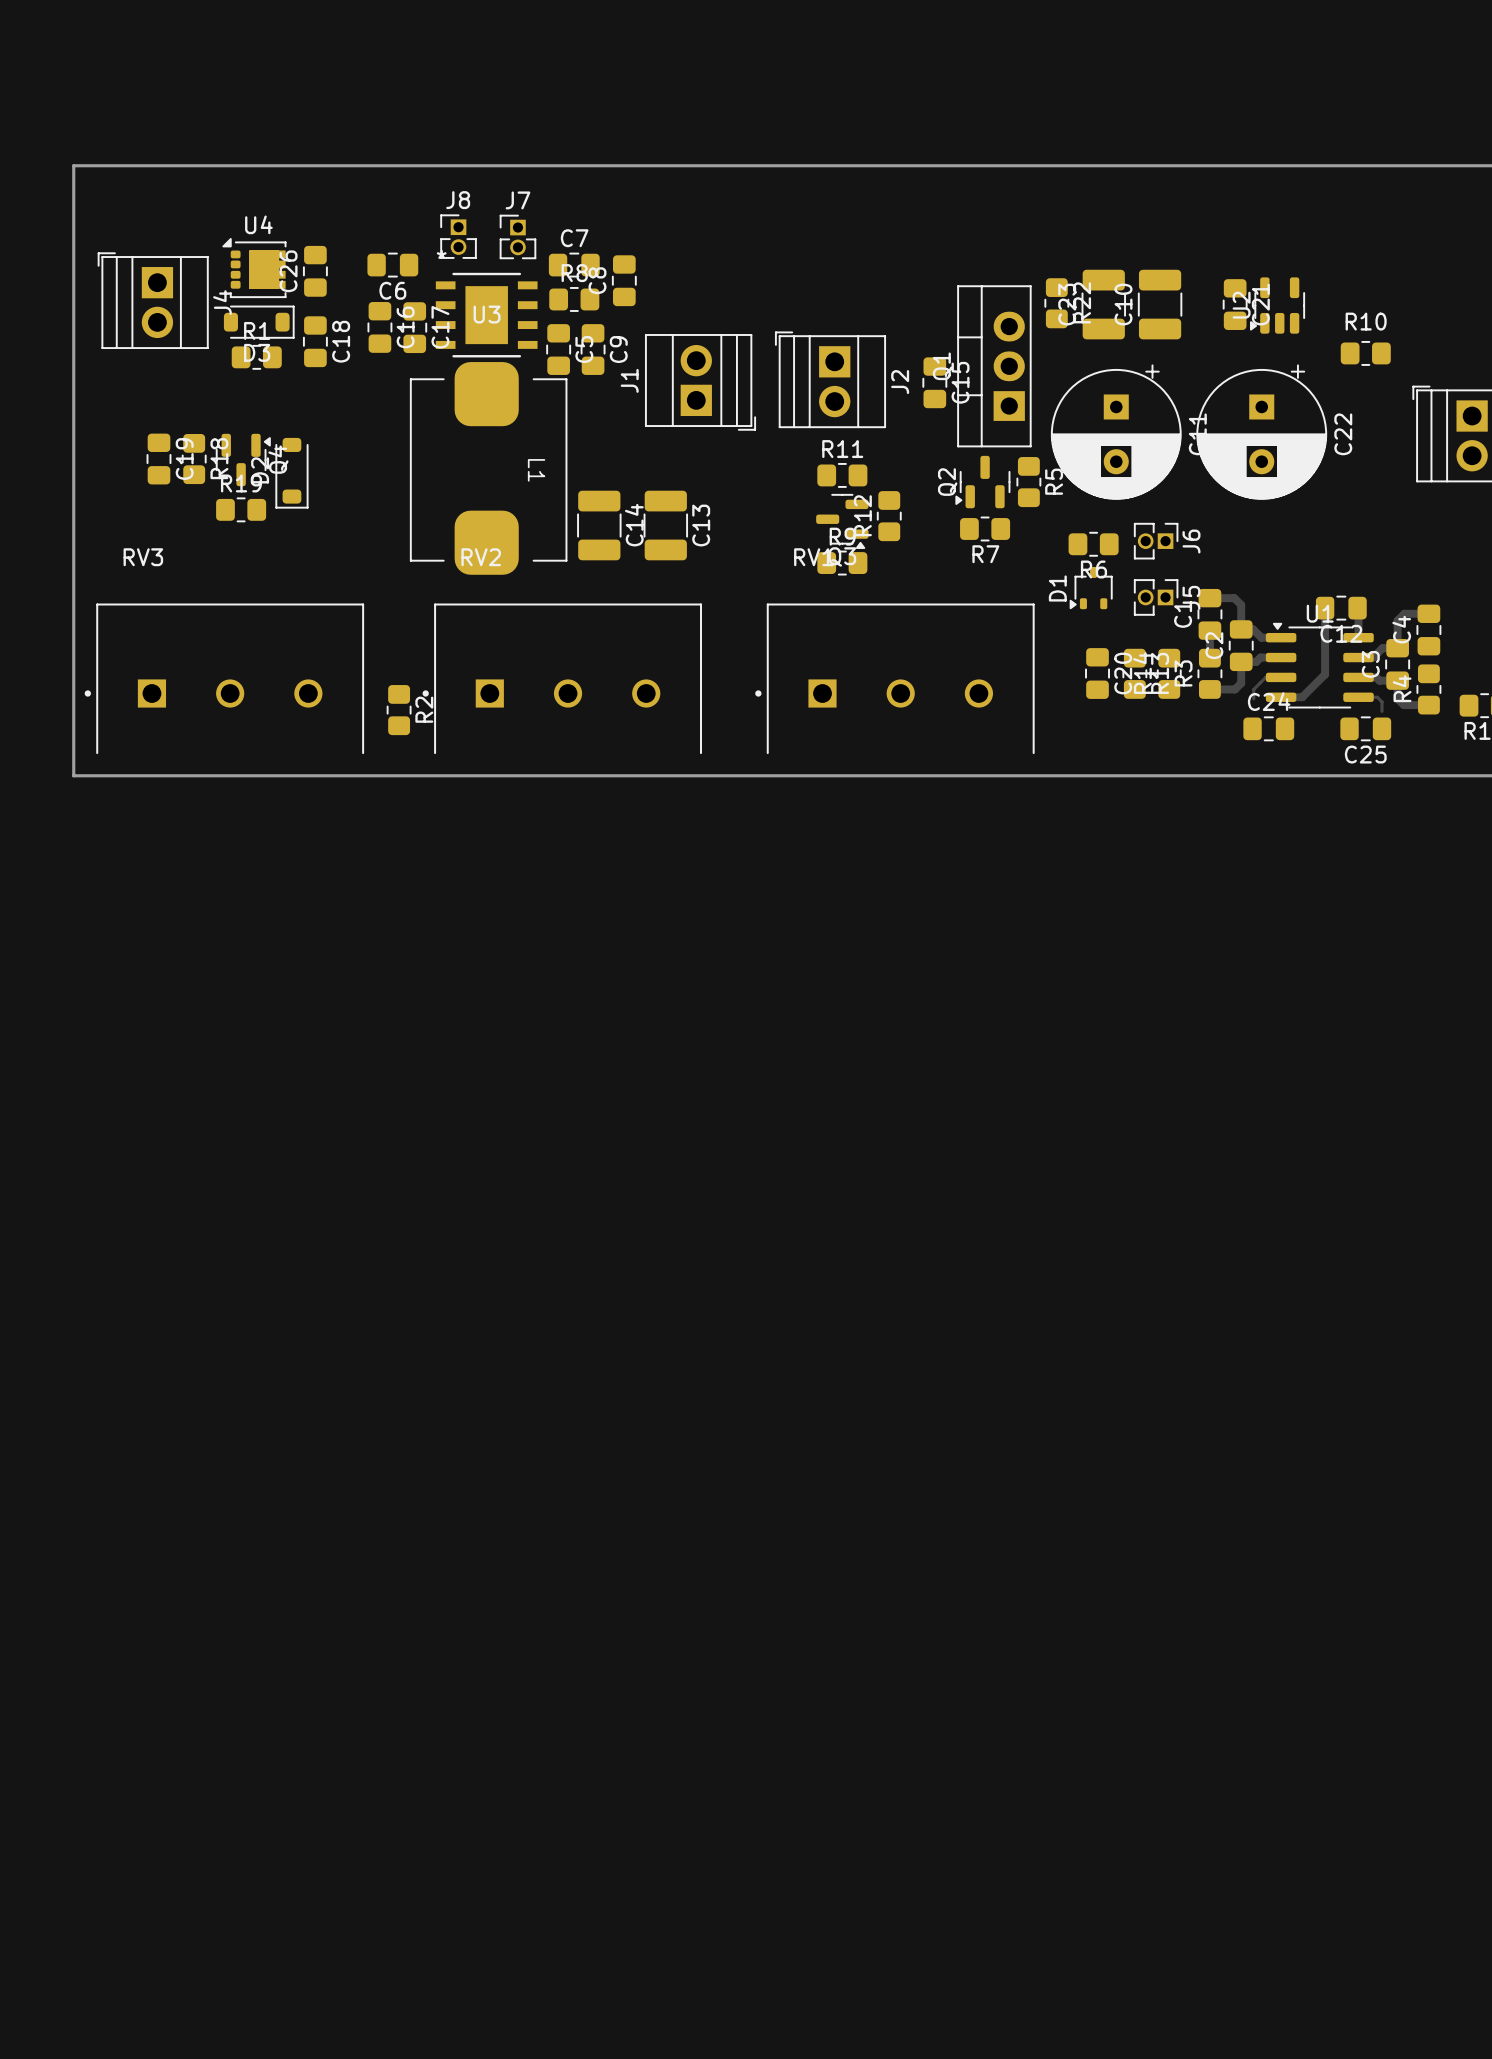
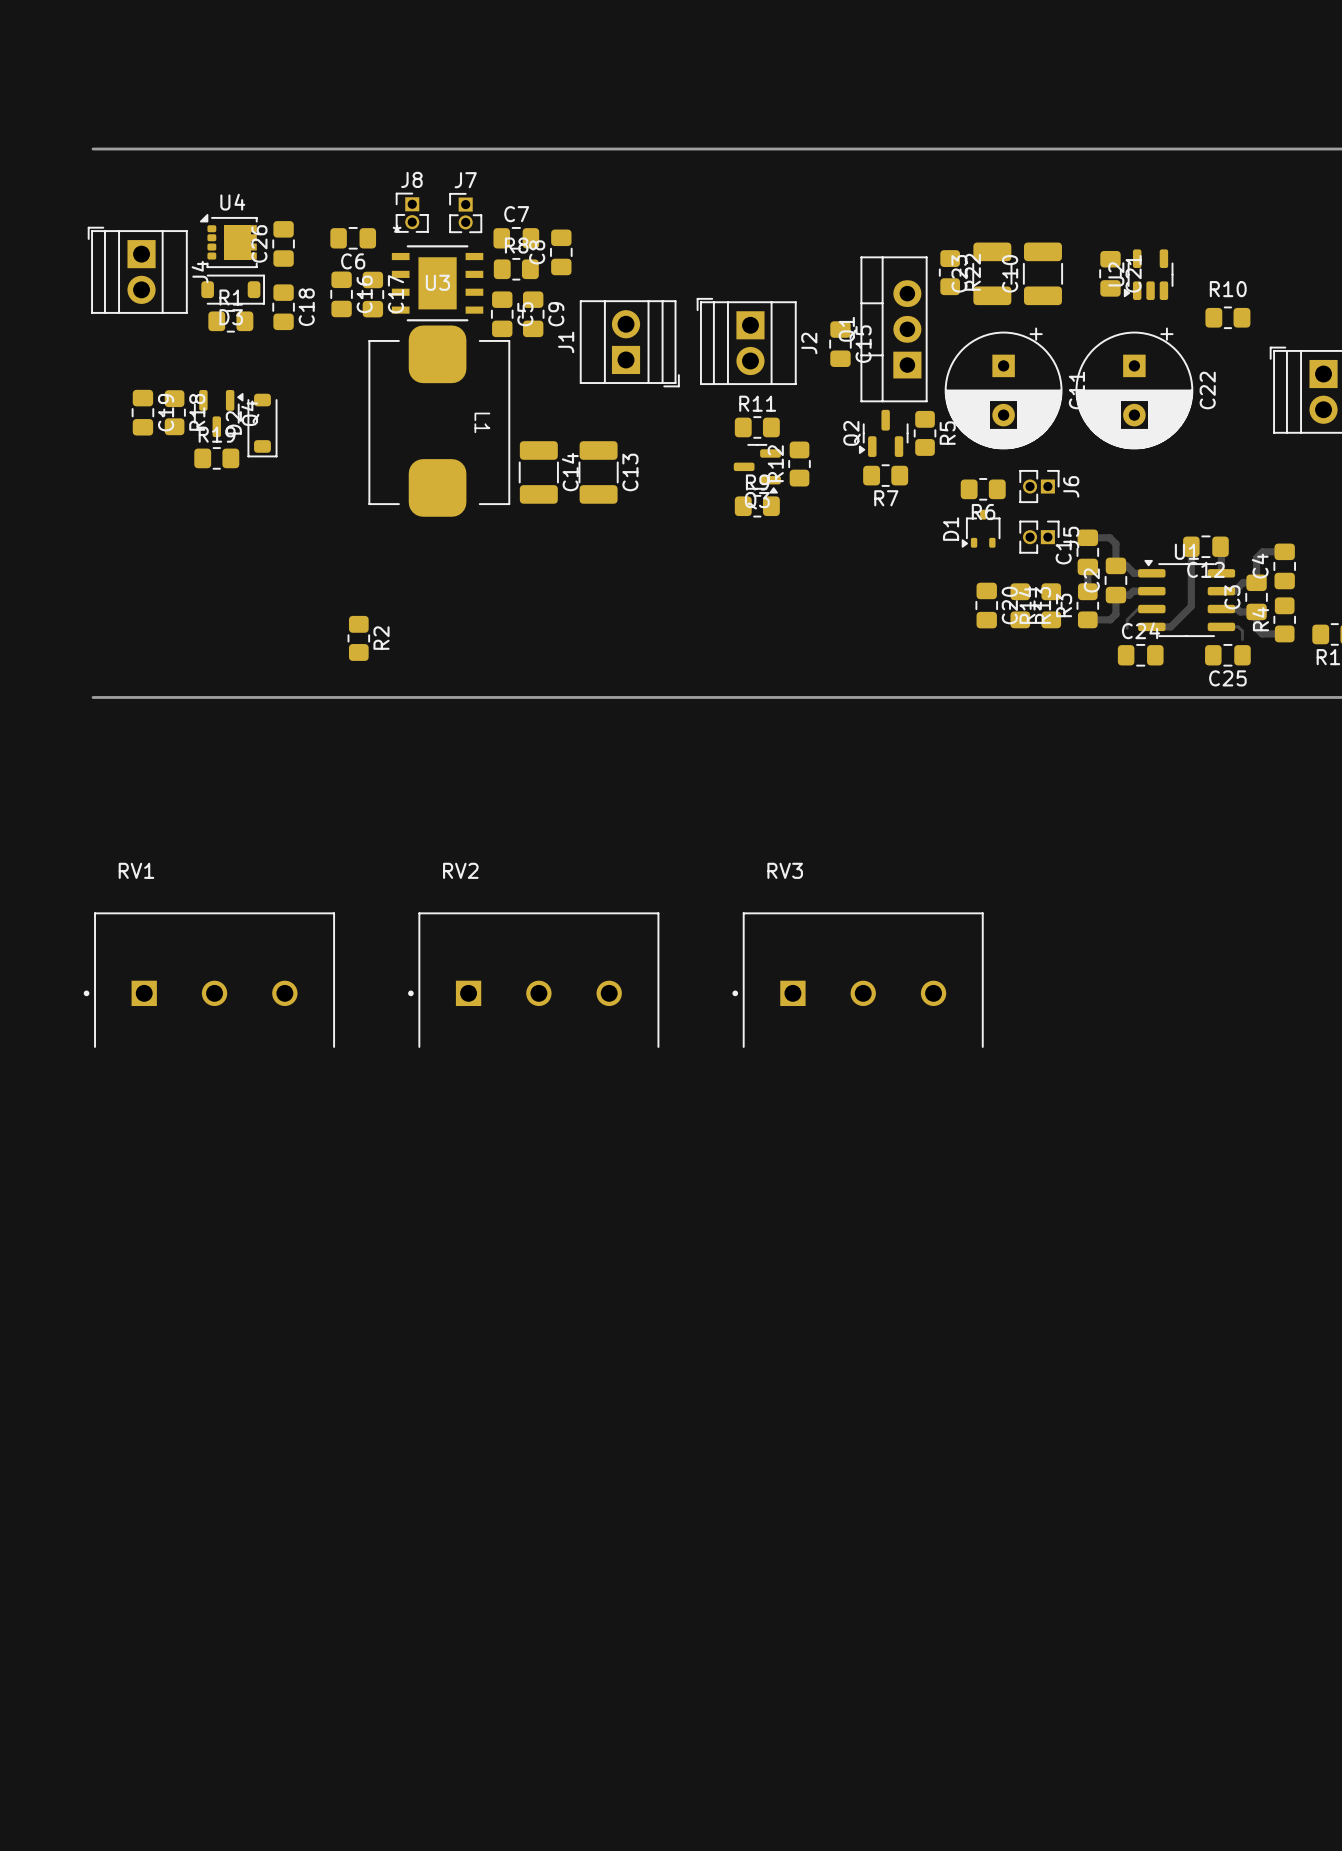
board edge: (103, 165) (73, 165) (73, 775) (103, 775) -> none
RV3 position: (224, 678) -> (858, 980)
RV2 position: (562, 678) -> (533, 980)
RV1 position: (894, 678) -> (209, 980)

